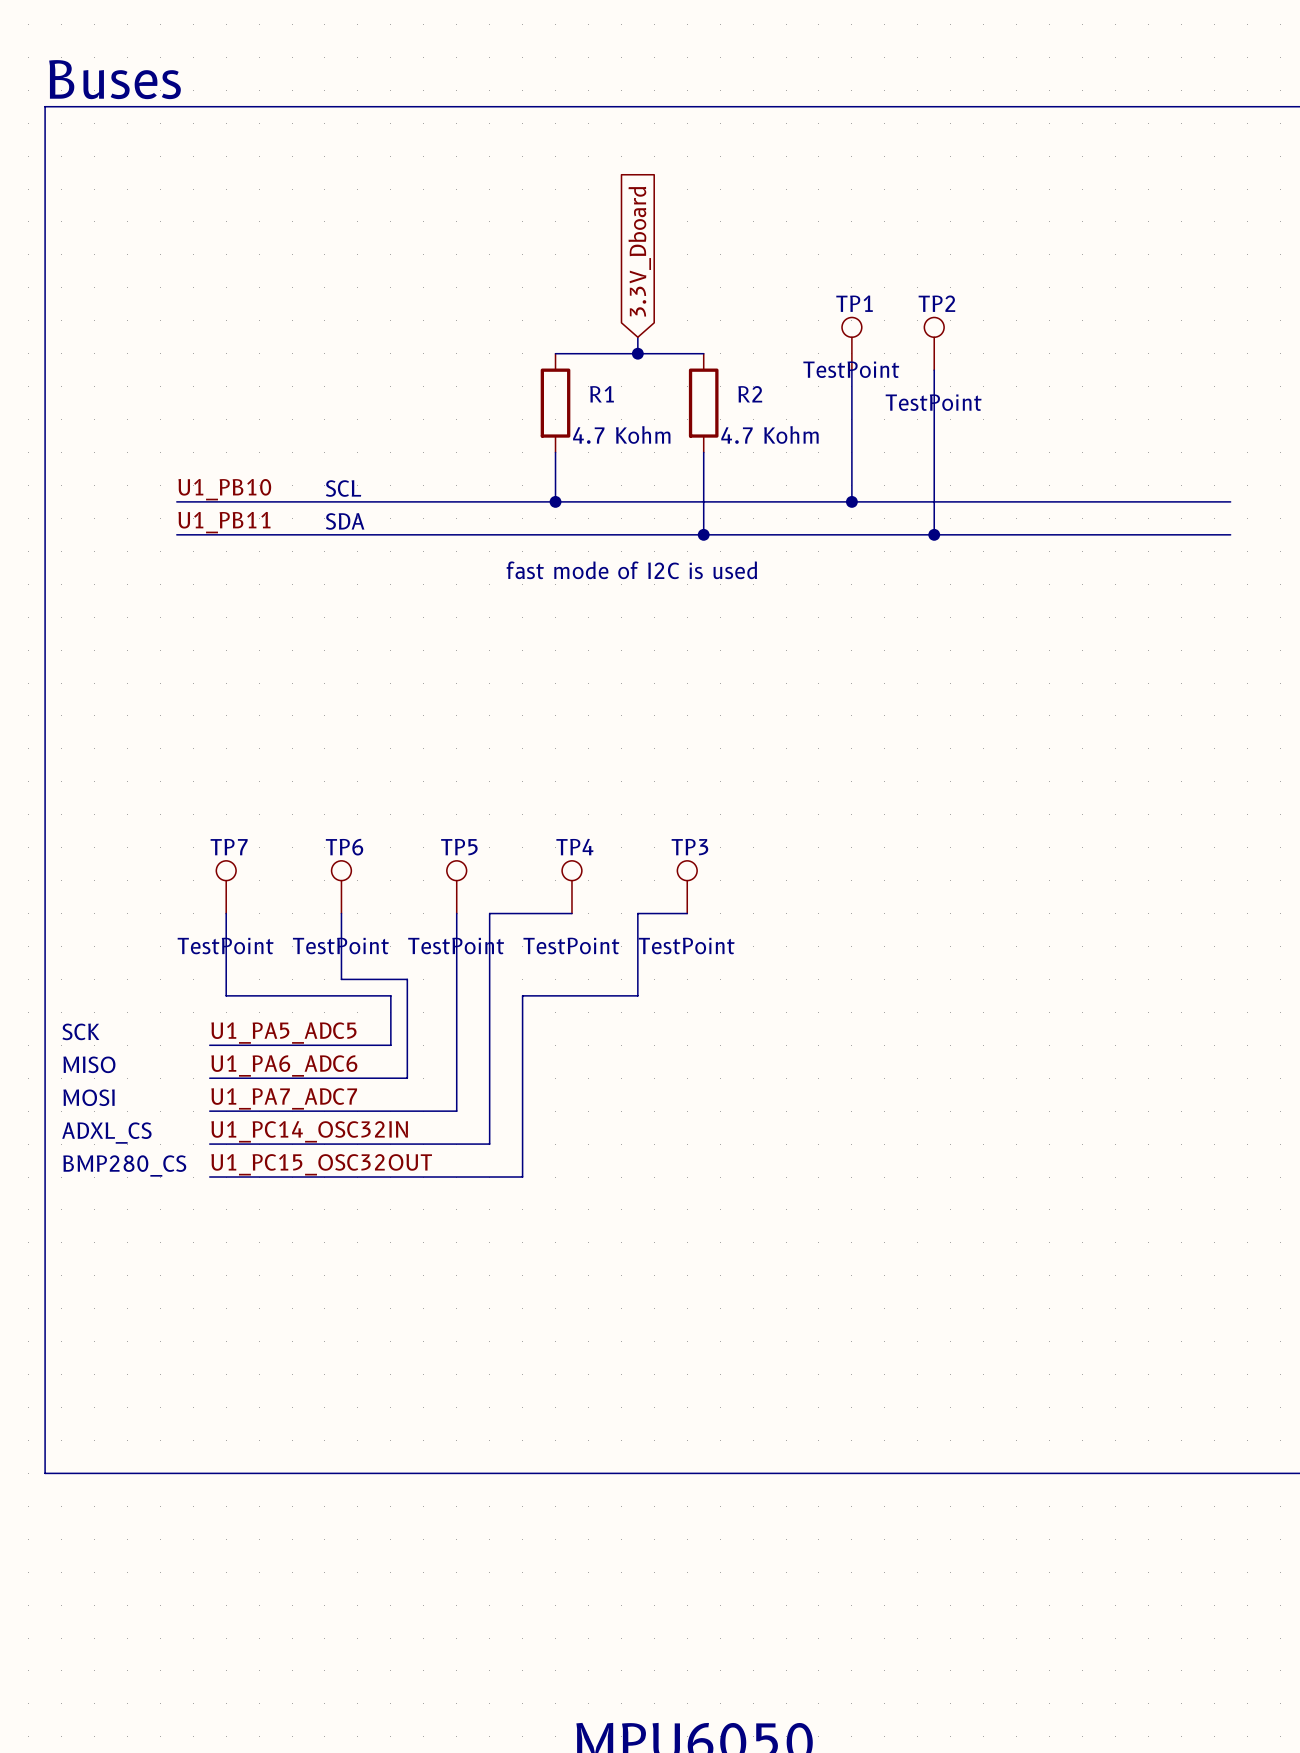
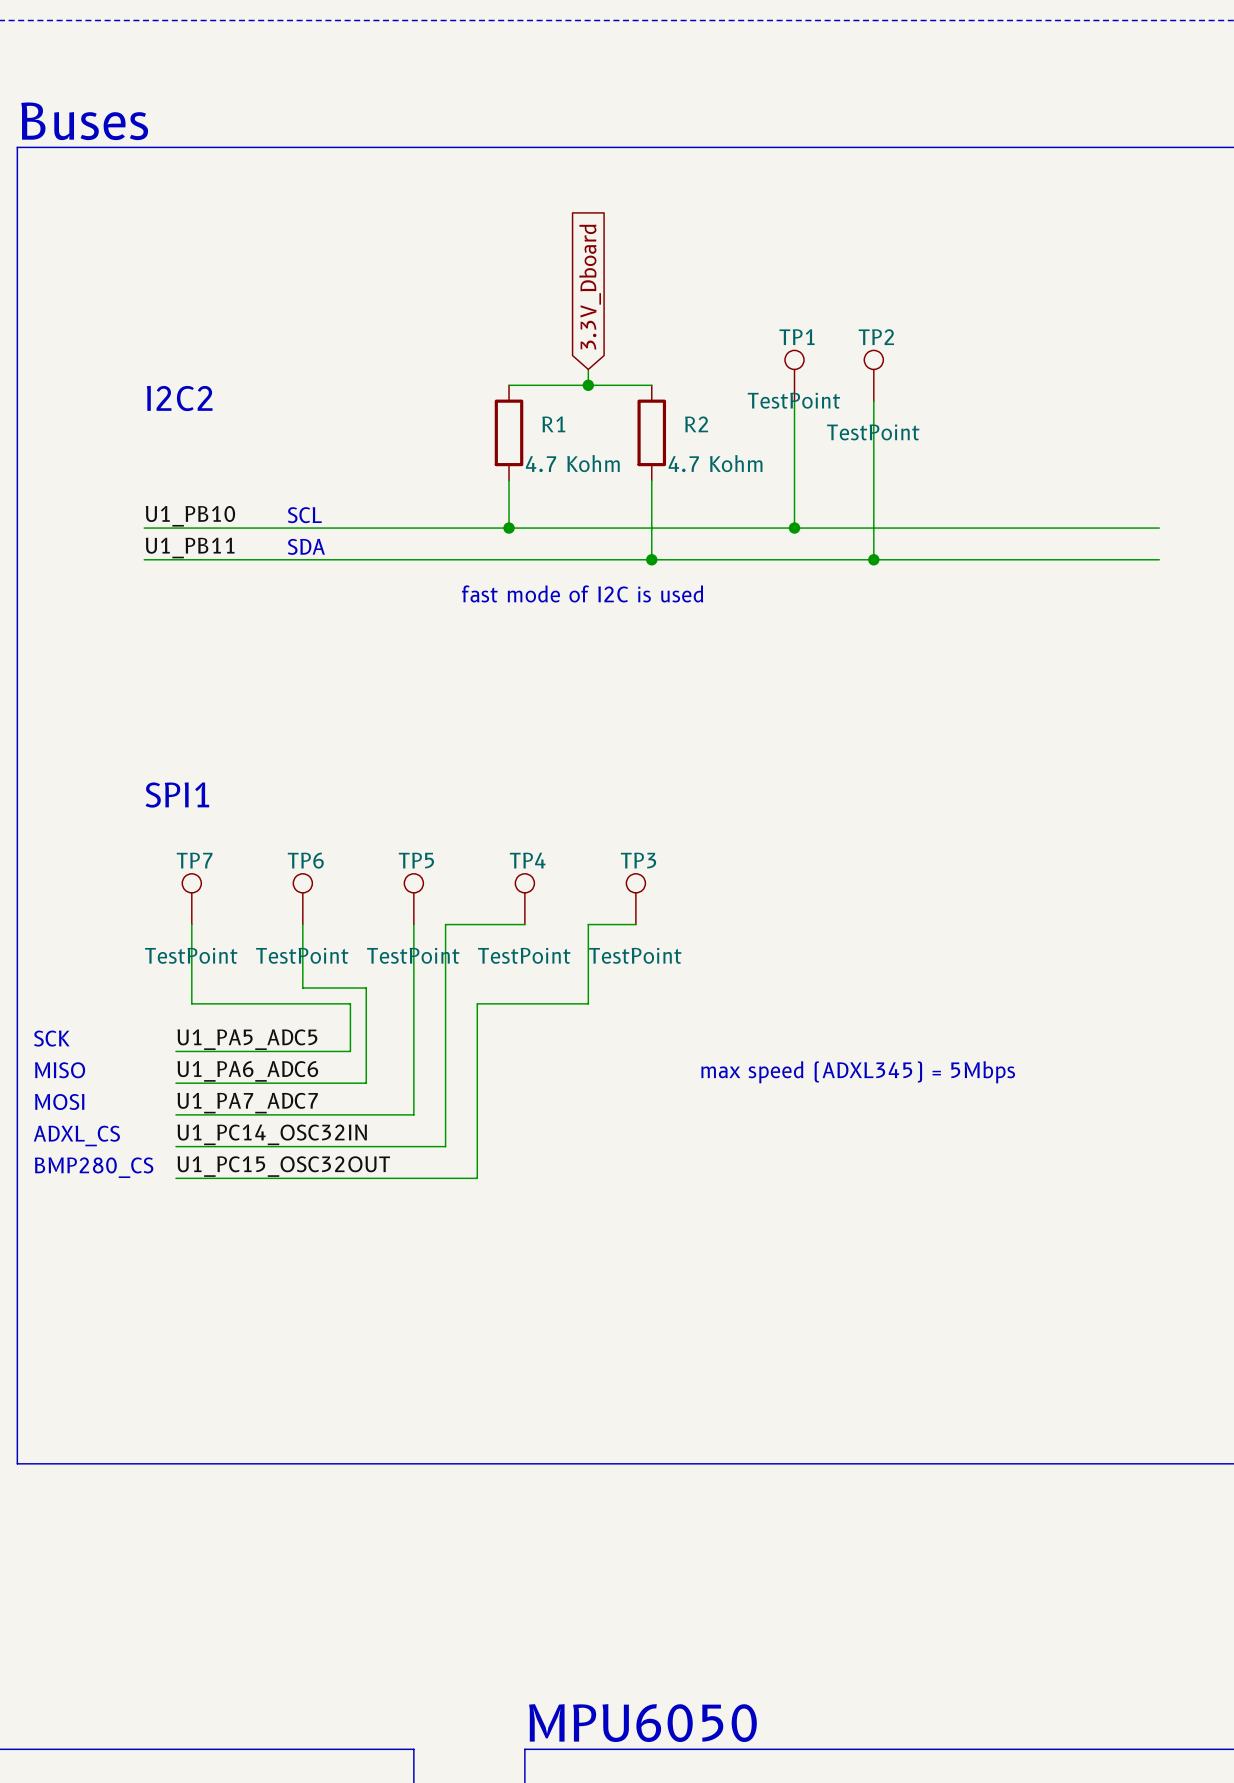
text: none -> I2C2 (179, 398)
text: none -> SPI1 (177, 795)
text: none -> max speed (ADXL345) = 5Mbps (858, 1072)

